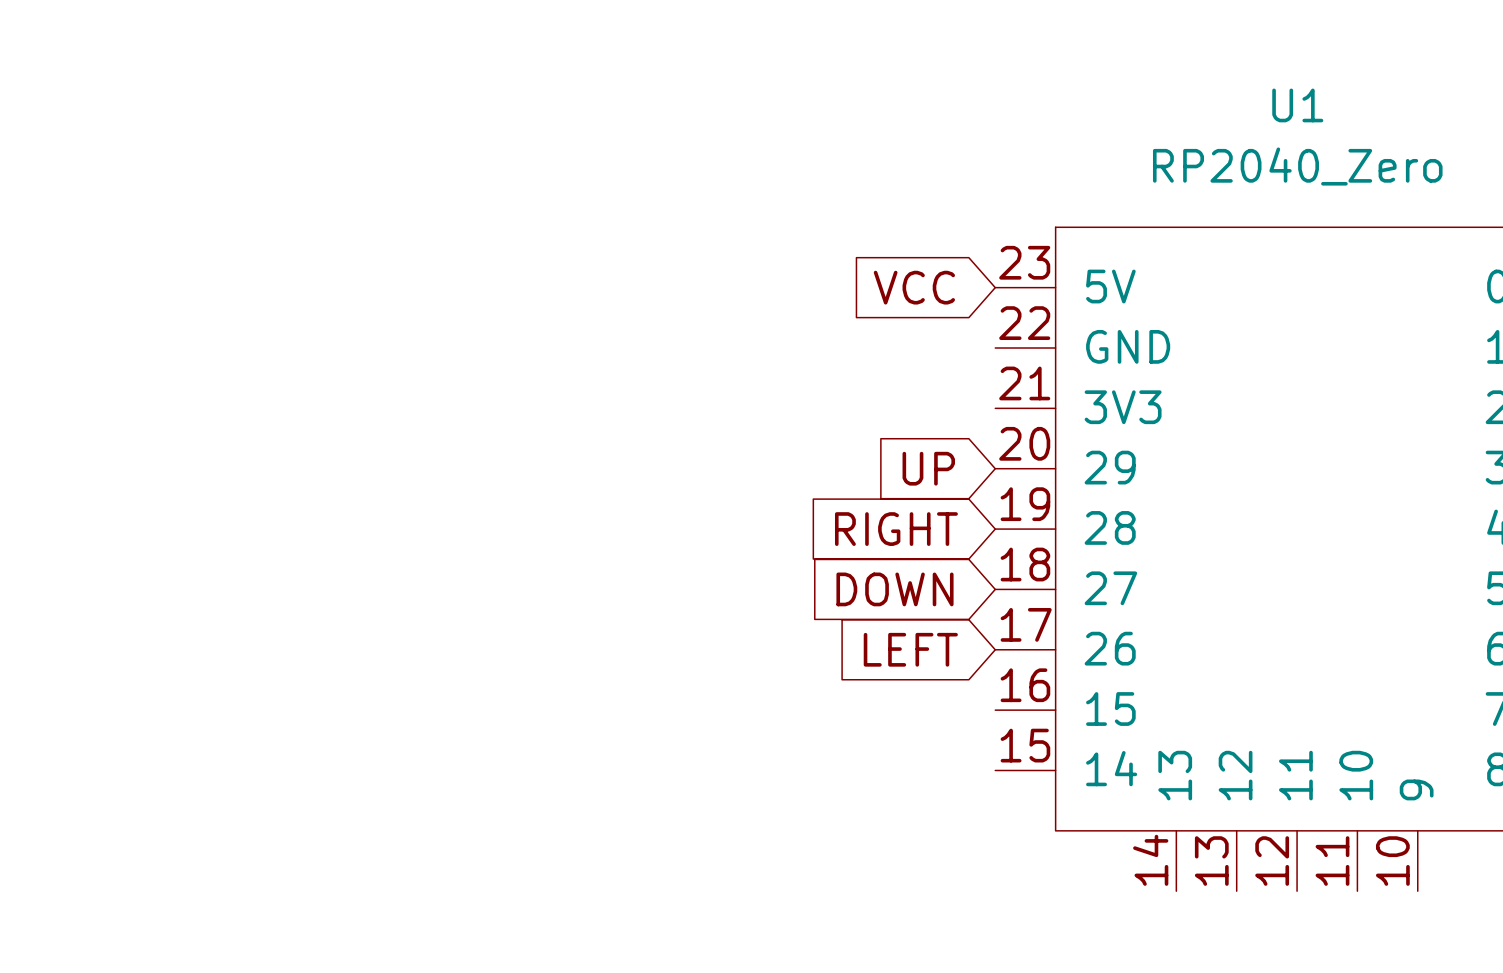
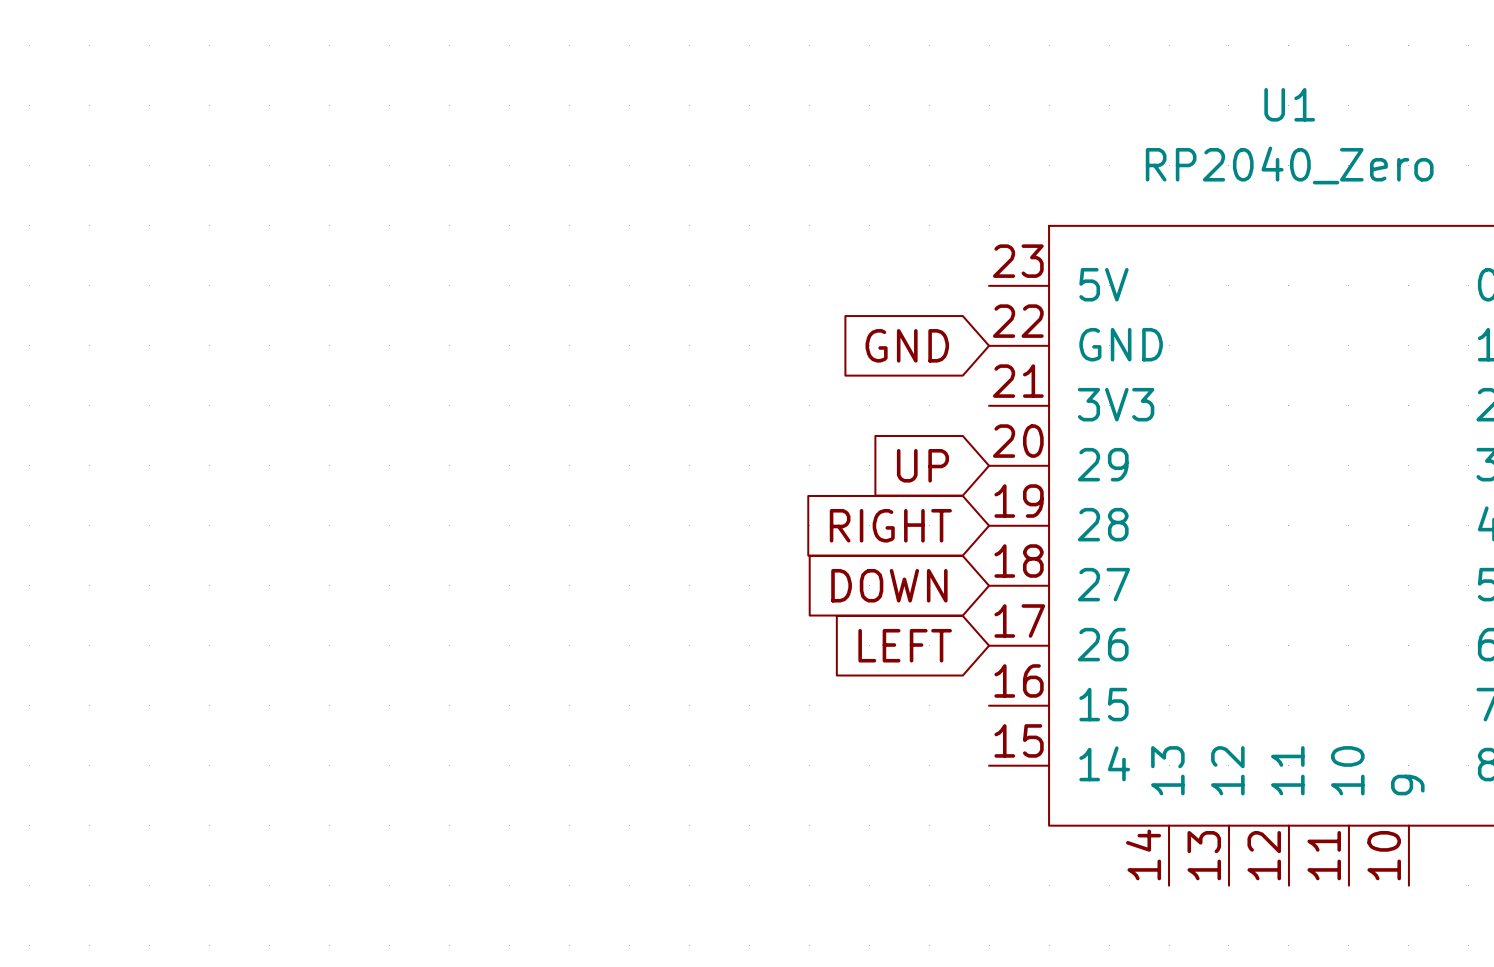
global label: VCC (914, 287) -> none
global label: none -> GND (907, 345)

